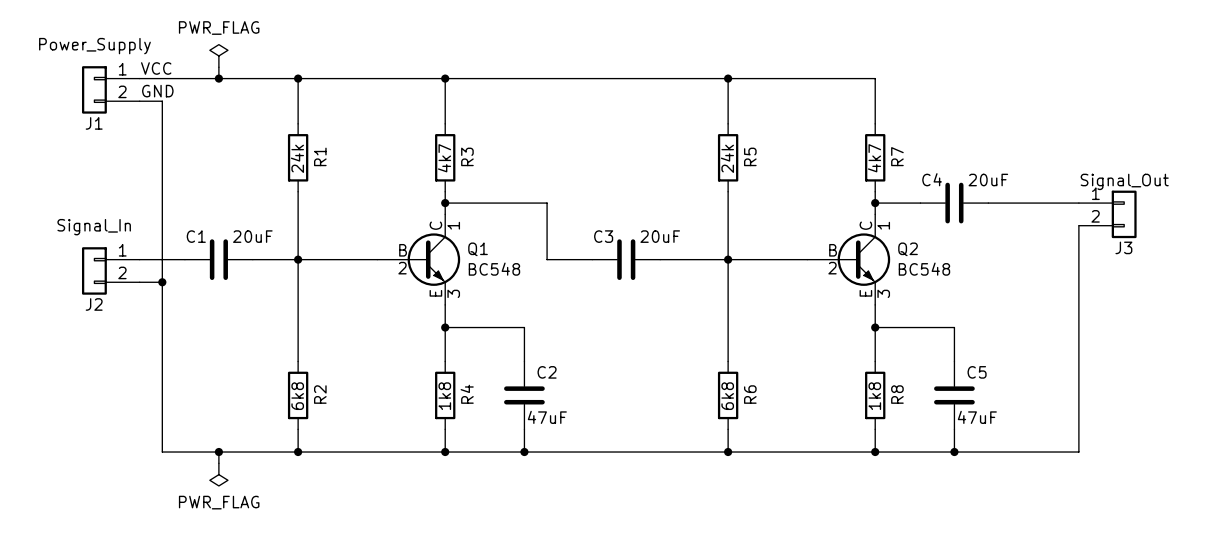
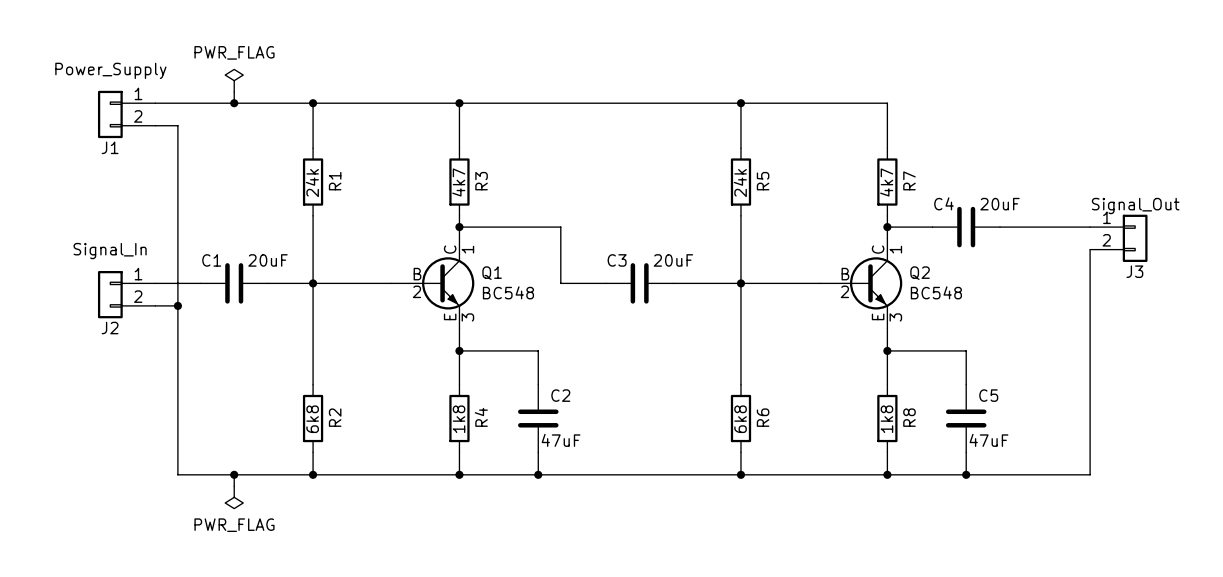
label: VCC (156, 68) -> none
label: GND (157, 91) -> none

